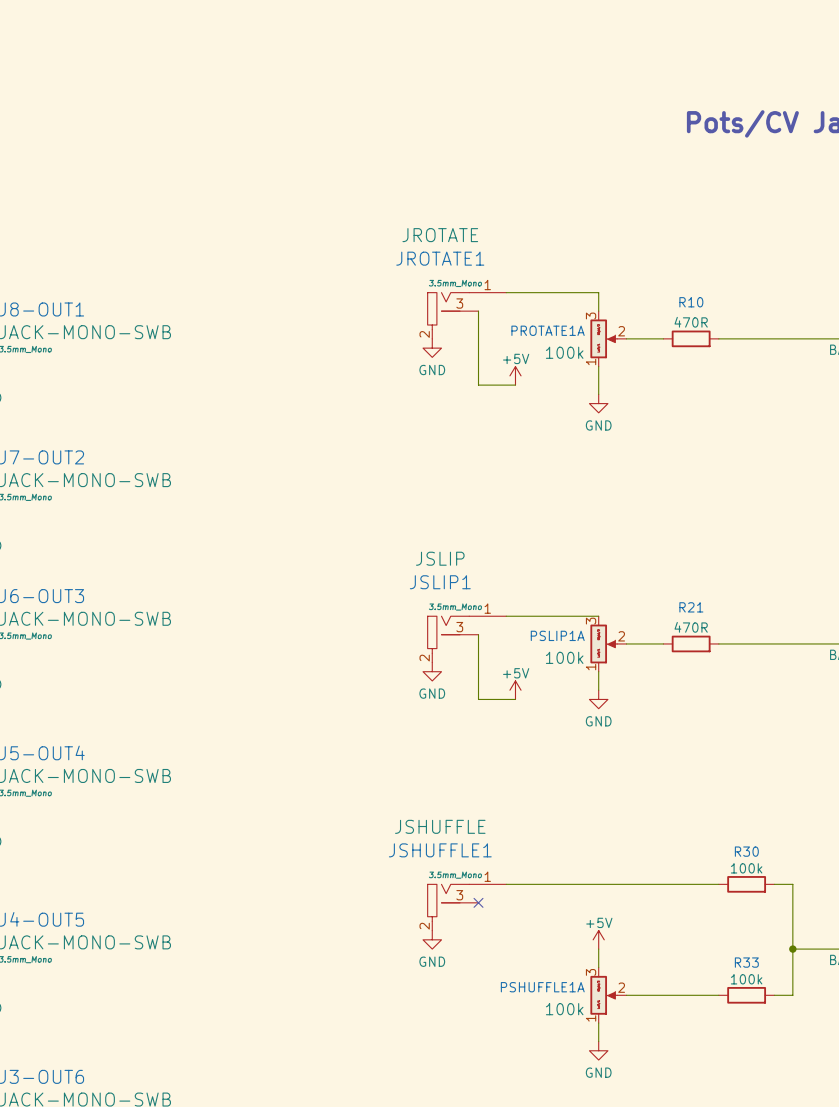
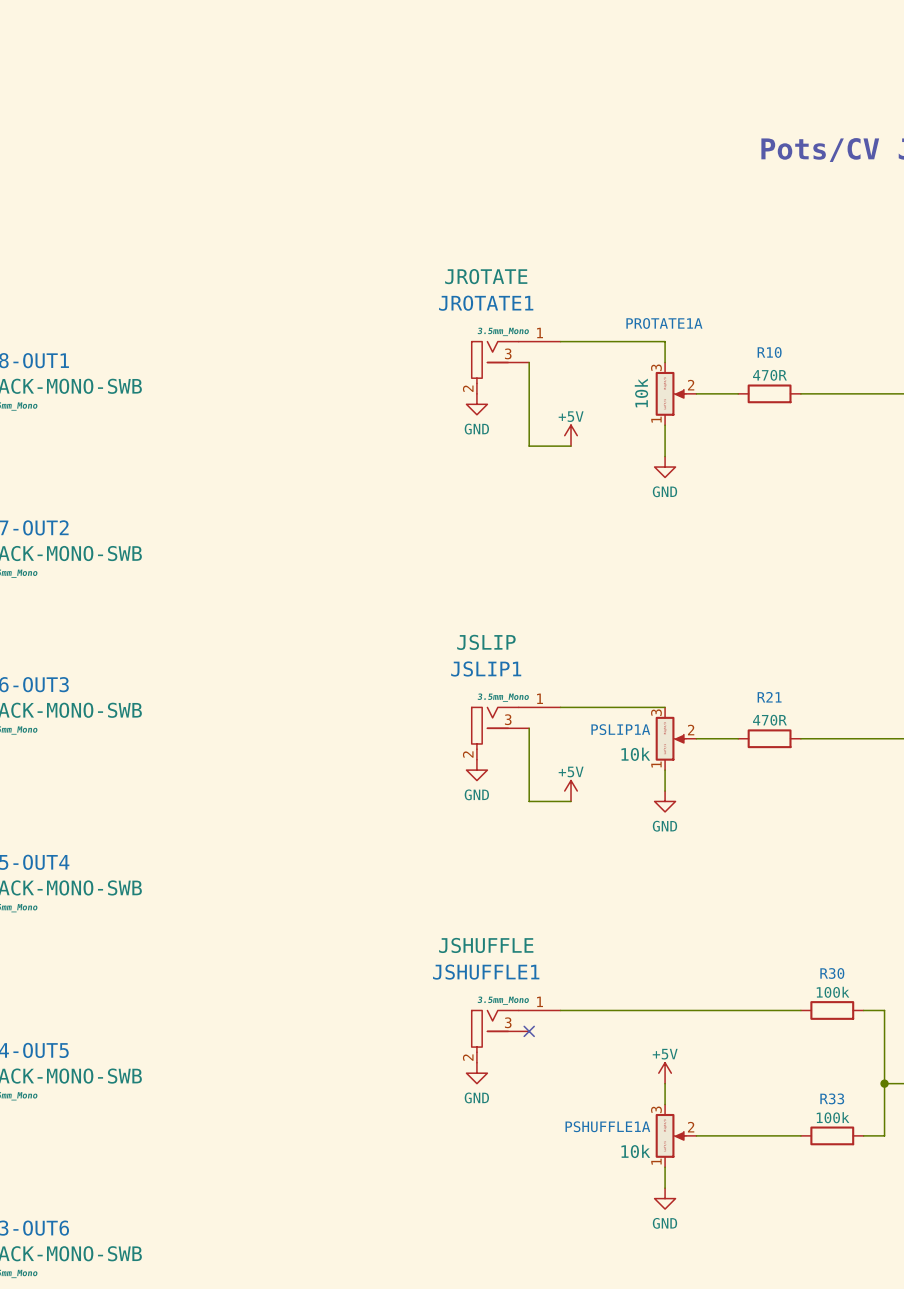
PROTATE1A name position: PROTATE1A (548, 330) -> PROTATE1A (664, 323)
PROTATE1A text: 100k (564, 352) -> 10k (641, 392)
PSLIP1A text: 100k (564, 657) -> 10k (635, 754)
PSHUFFLE1A text: 100k (564, 1009) -> 10k (635, 1151)

